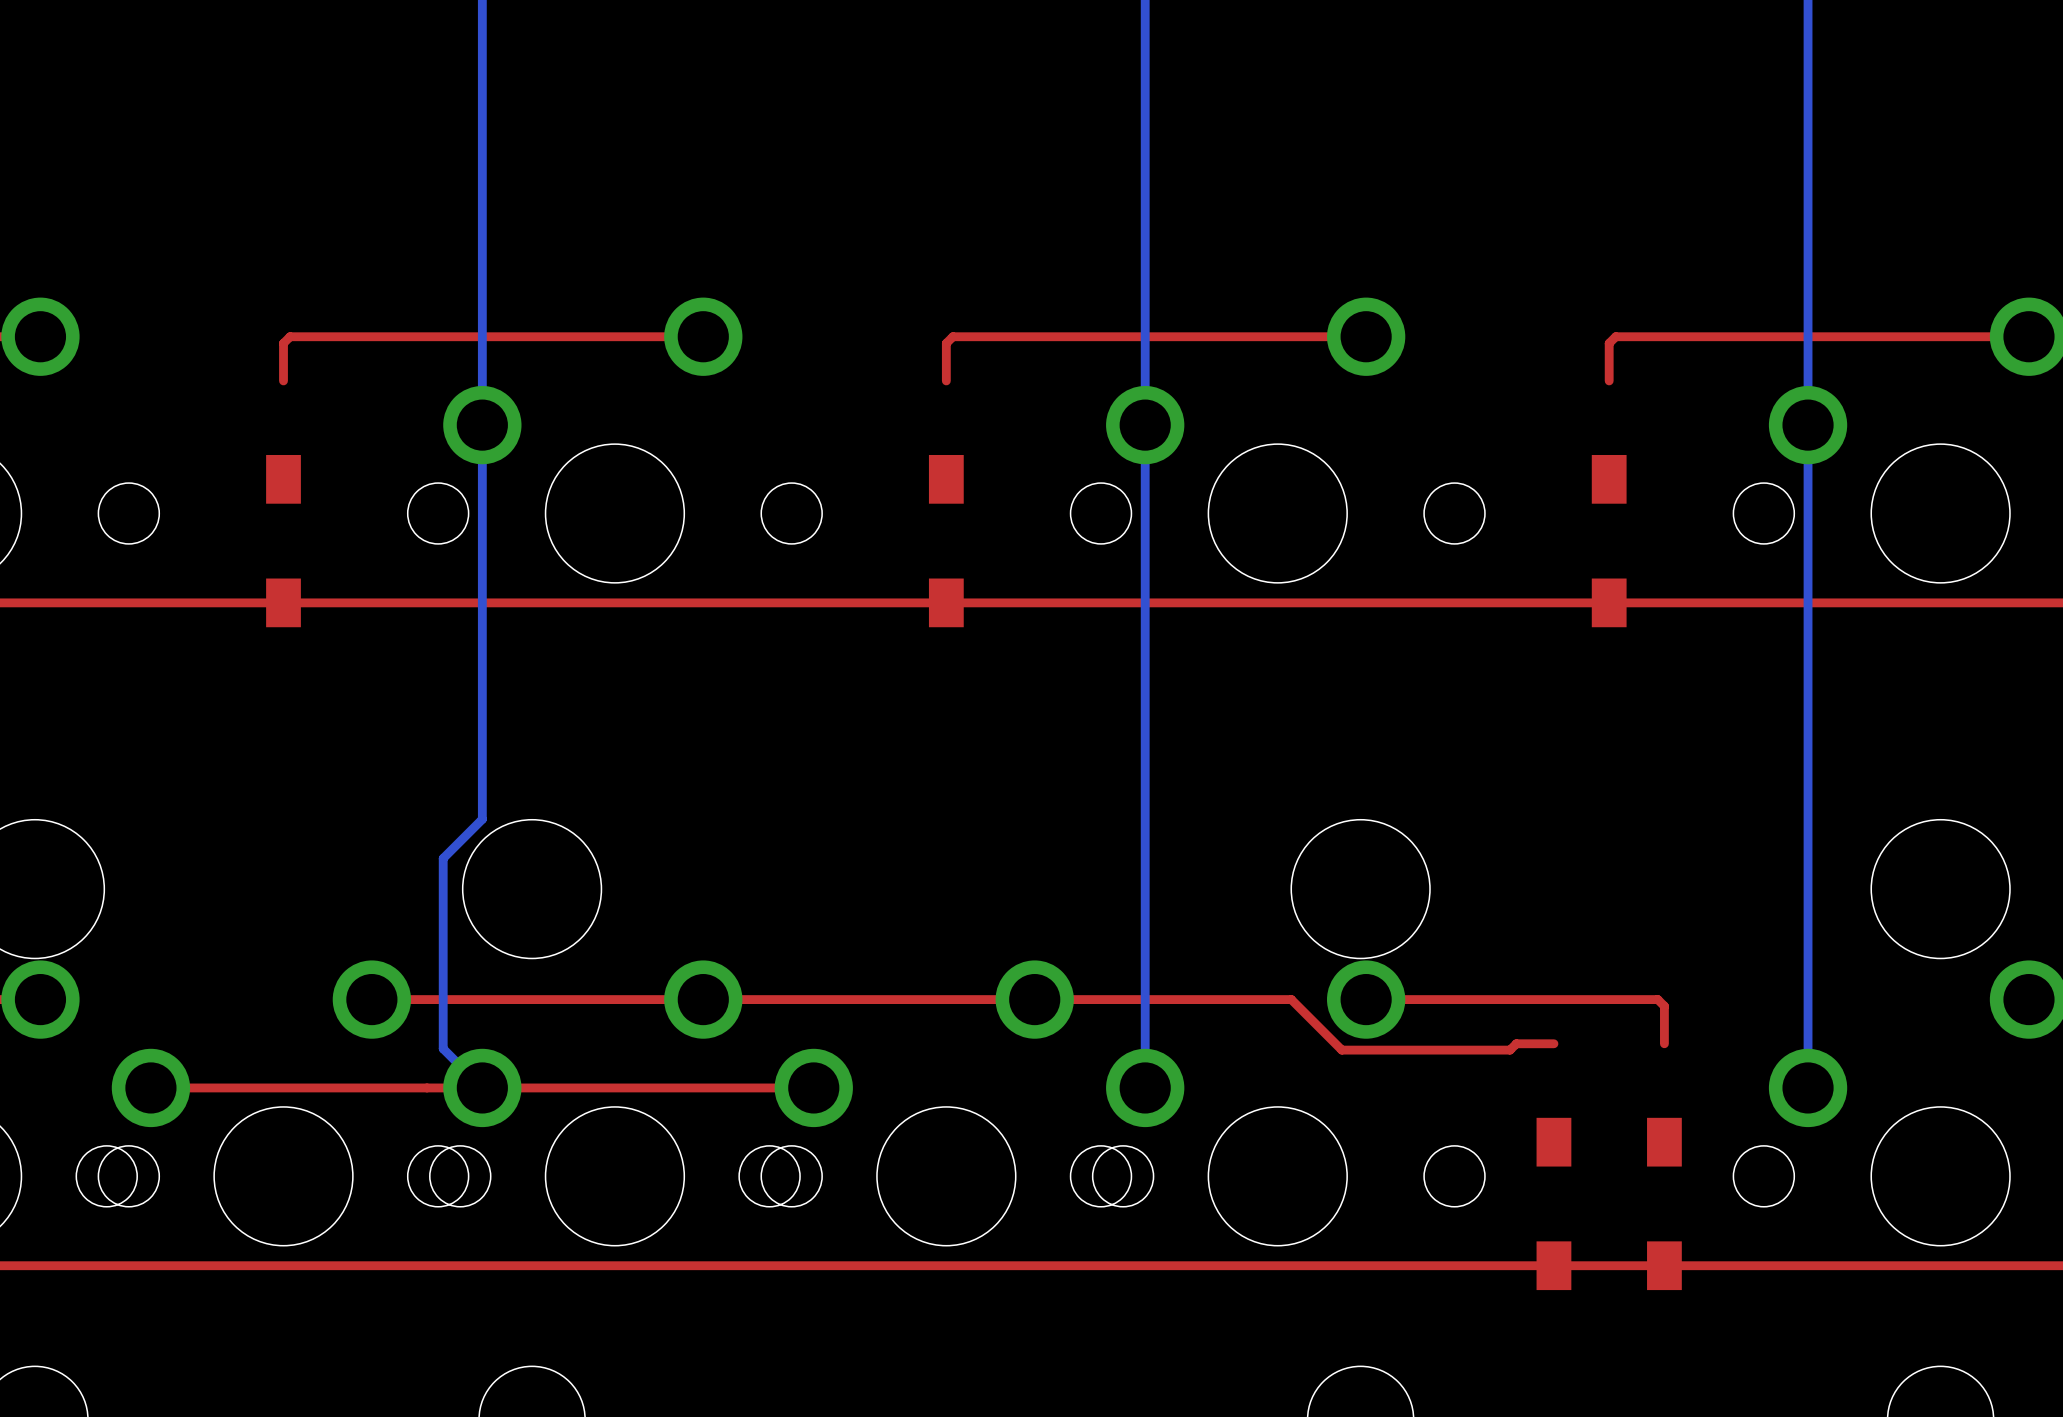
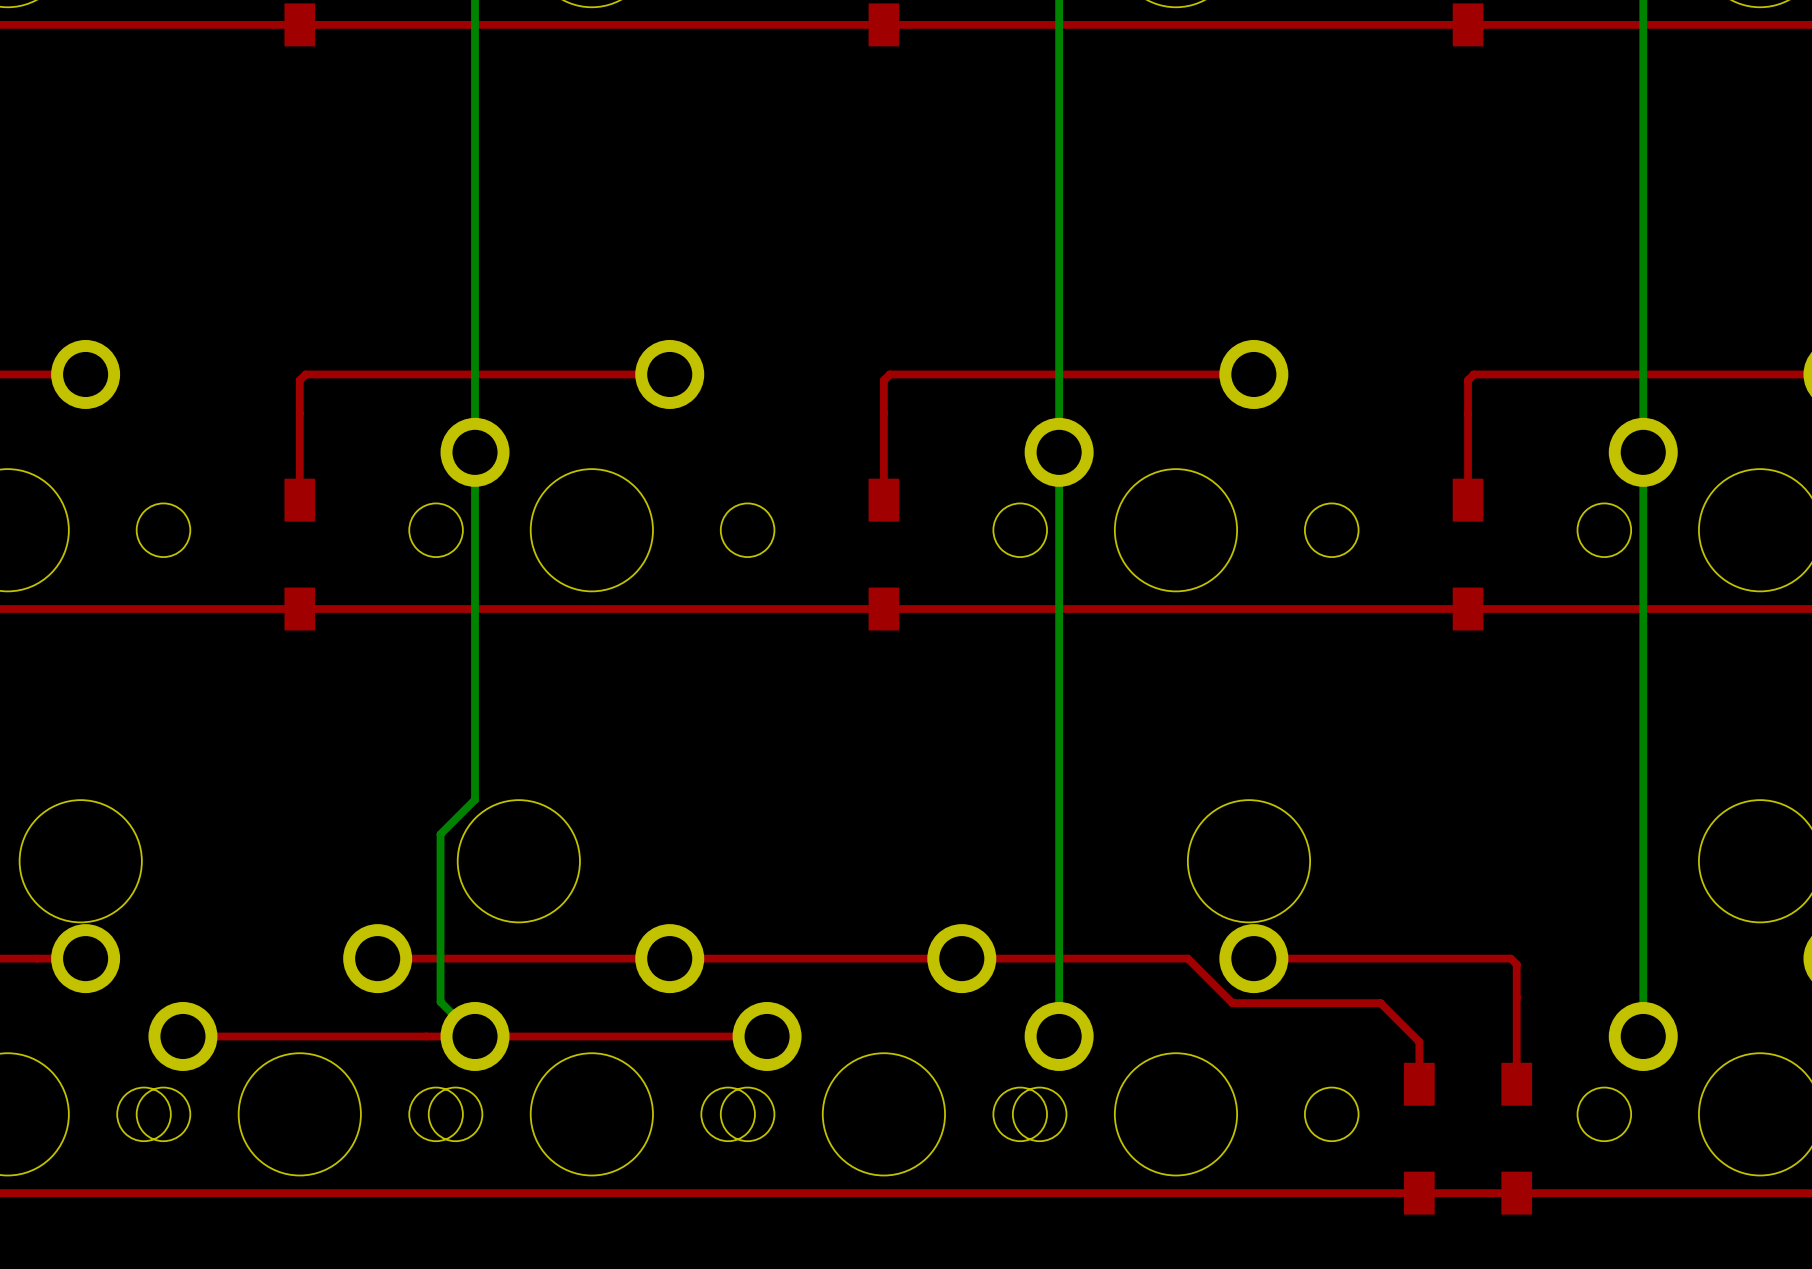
top track: none -> (299, 413) (299, 500)
top track: none -> (883, 413) (883, 500)
top track: none -> (1468, 413) (1468, 500)
top track: (1553, 1043) (1516, 1043) (1510, 1050) -> (1419, 1084) (1419, 1041) (1380, 1003)
top track: none -> (1516, 997) (1516, 1084)

